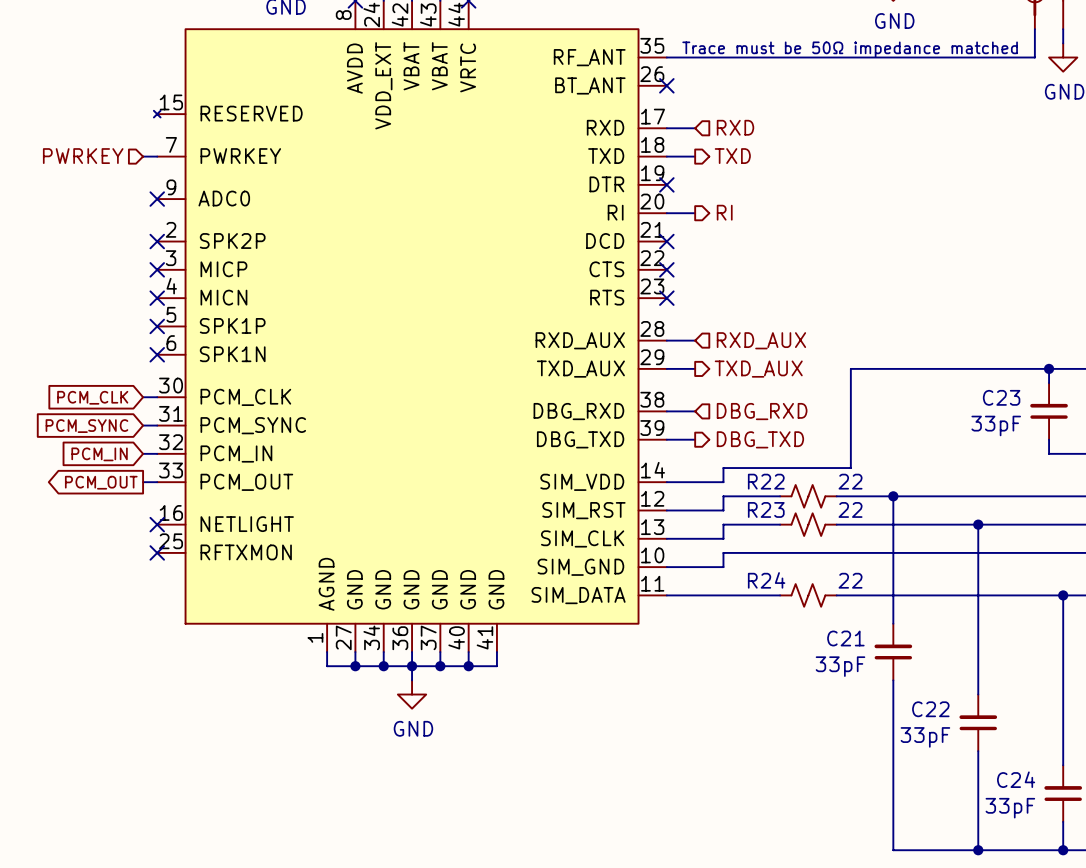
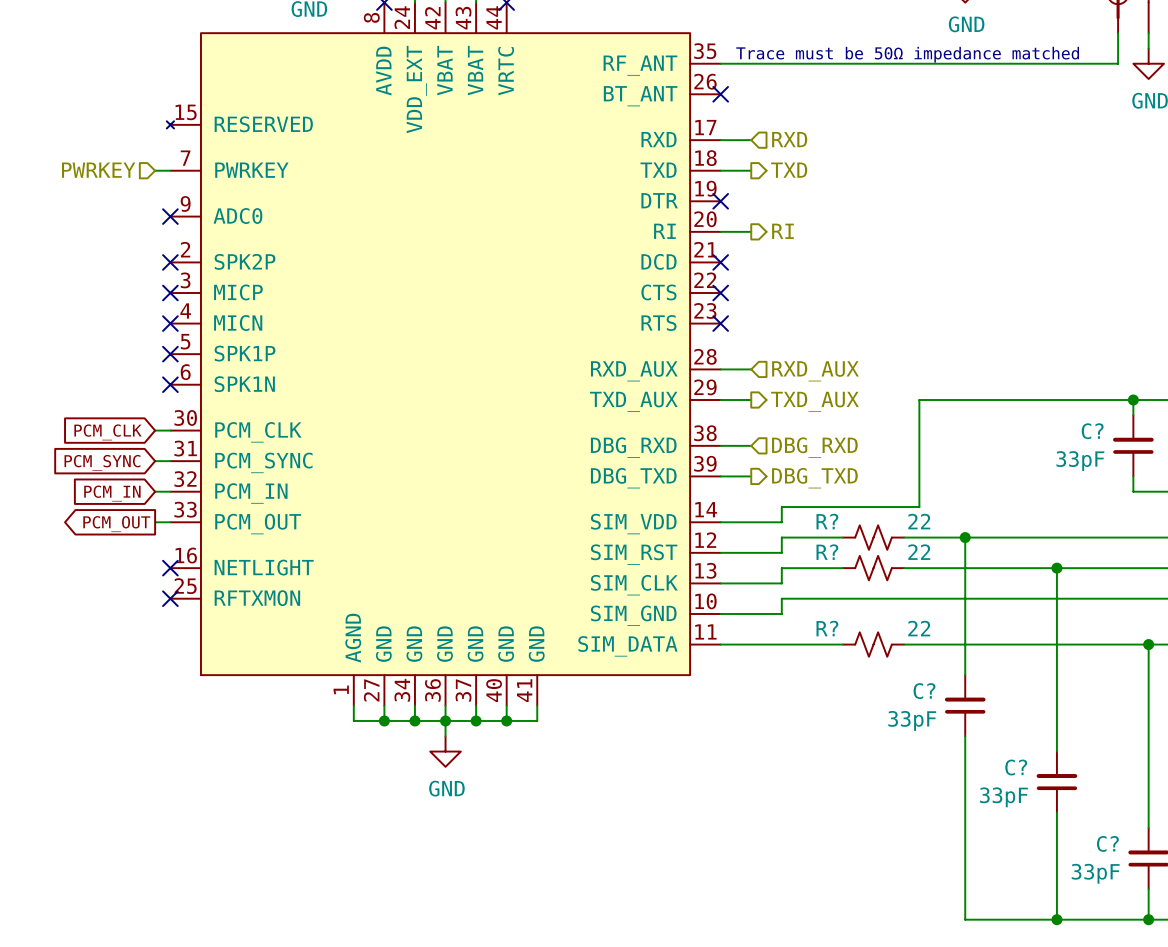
C23 name: C23 (1001, 397) -> C? (1092, 431)
R22 name: R22 (766, 481) -> R? (827, 521)
R23 name: R23 (766, 509) -> R? (827, 552)
R24 name: R24 (766, 580) -> R? (827, 628)
C21 name: C21 (845, 638) -> C? (924, 691)
C22 name: C22 (930, 709) -> C? (1016, 767)
C24 name: C24 (1016, 779) -> C? (1107, 843)

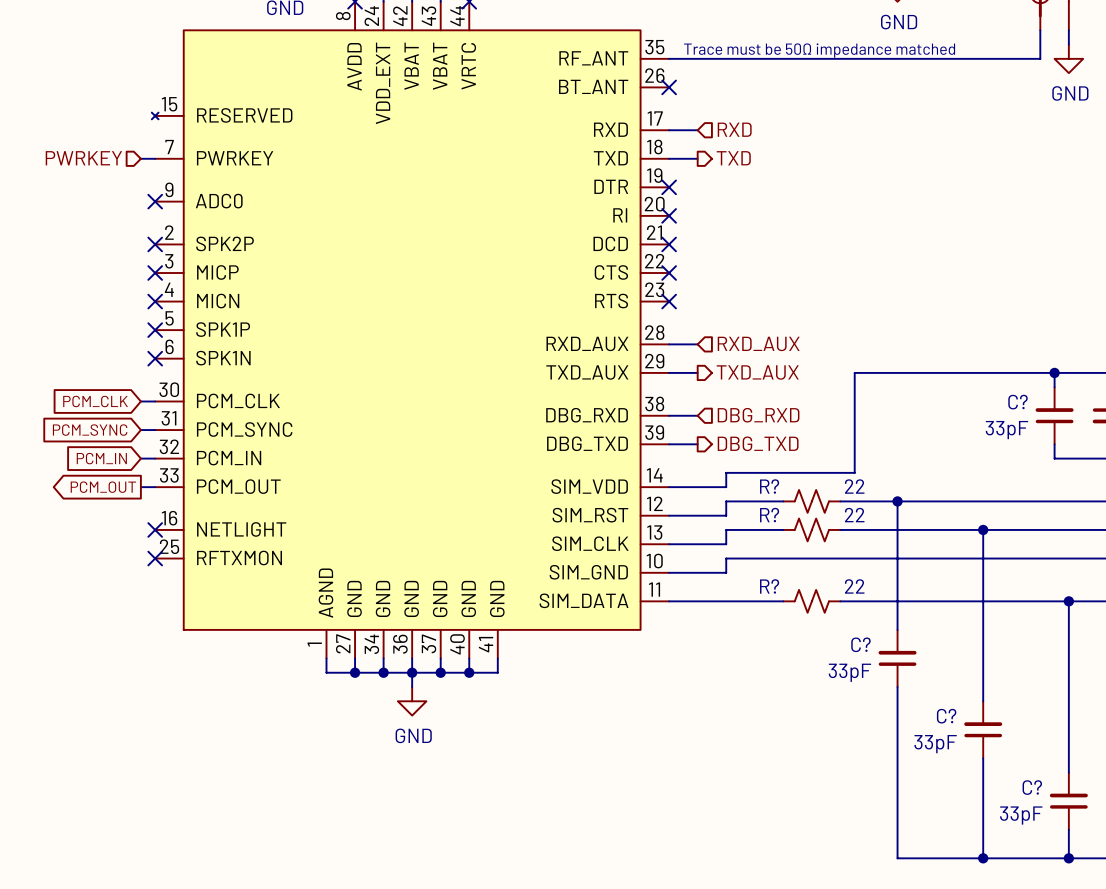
wire: (720, 231) (751, 231) -> none
no-connect mark: none -> (669, 215)
hierarchical label: RI (782, 231) -> none

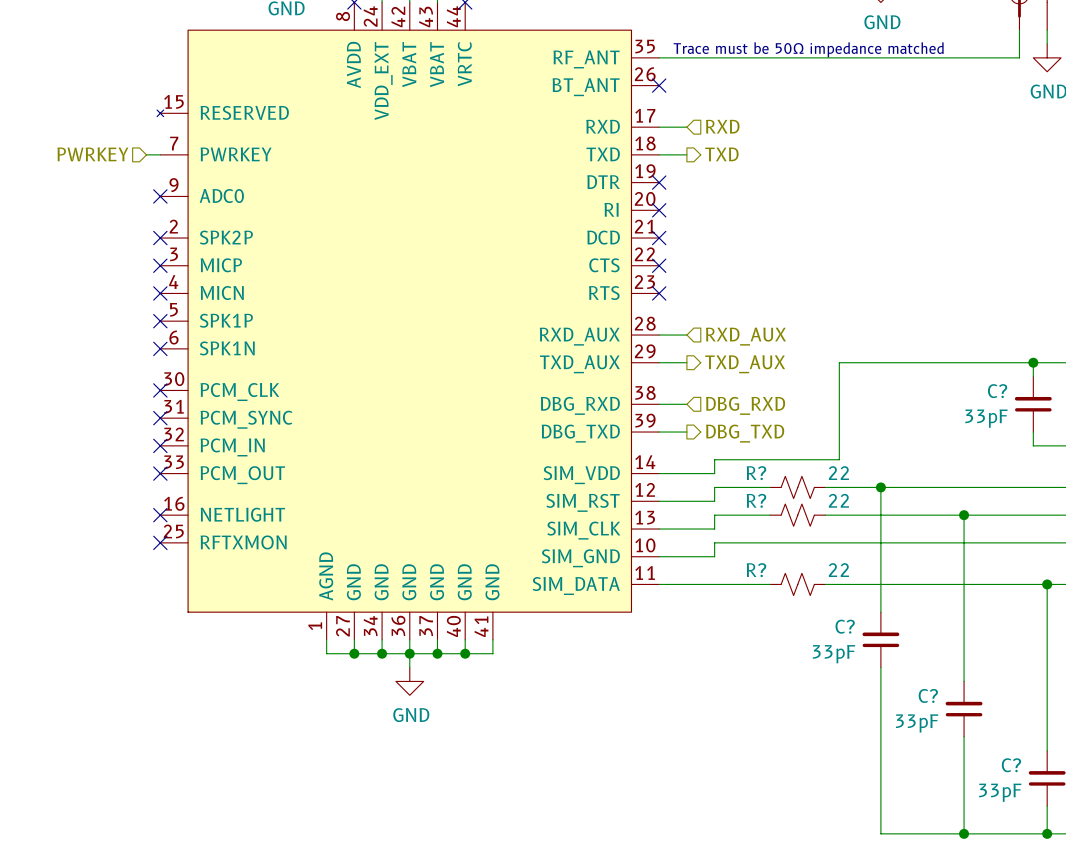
global label: PCM_CLK (95, 401) -> none
wire: (140, 401) (155, 401) -> none
no-connect mark: none -> (160, 390)
global label: PCM_SYNC (90, 430) -> none
wire: (140, 430) (155, 430) -> none
no-connect mark: none -> (160, 418)
global label: PCM_IN (101, 458) -> none
wire: (140, 458) (155, 458) -> none
no-connect mark: none -> (160, 445)
global label: PCM_OUT (103, 487) -> none
wire: (140, 487) (155, 487) -> none
no-connect mark: none -> (160, 473)

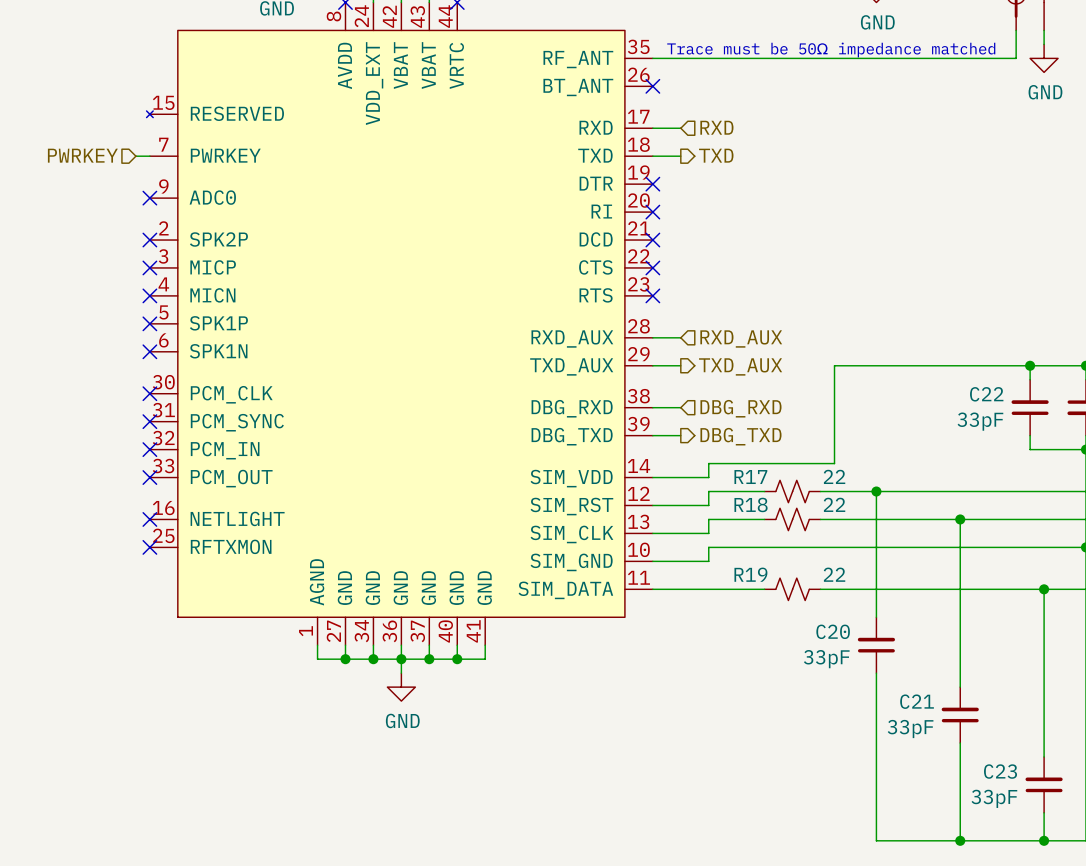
C? name: C? (997, 391) -> C22 (986, 394)
R? name: R? (756, 473) -> R17 (750, 477)
R? name: R? (756, 500) -> R18 (751, 504)
R? name: R? (756, 570) -> R19 (750, 574)
C? name: C? (845, 626) -> C20 (833, 631)
C? name: C? (928, 695) -> C21 (917, 701)
C? name: C? (1011, 765) -> C23 (1000, 771)

